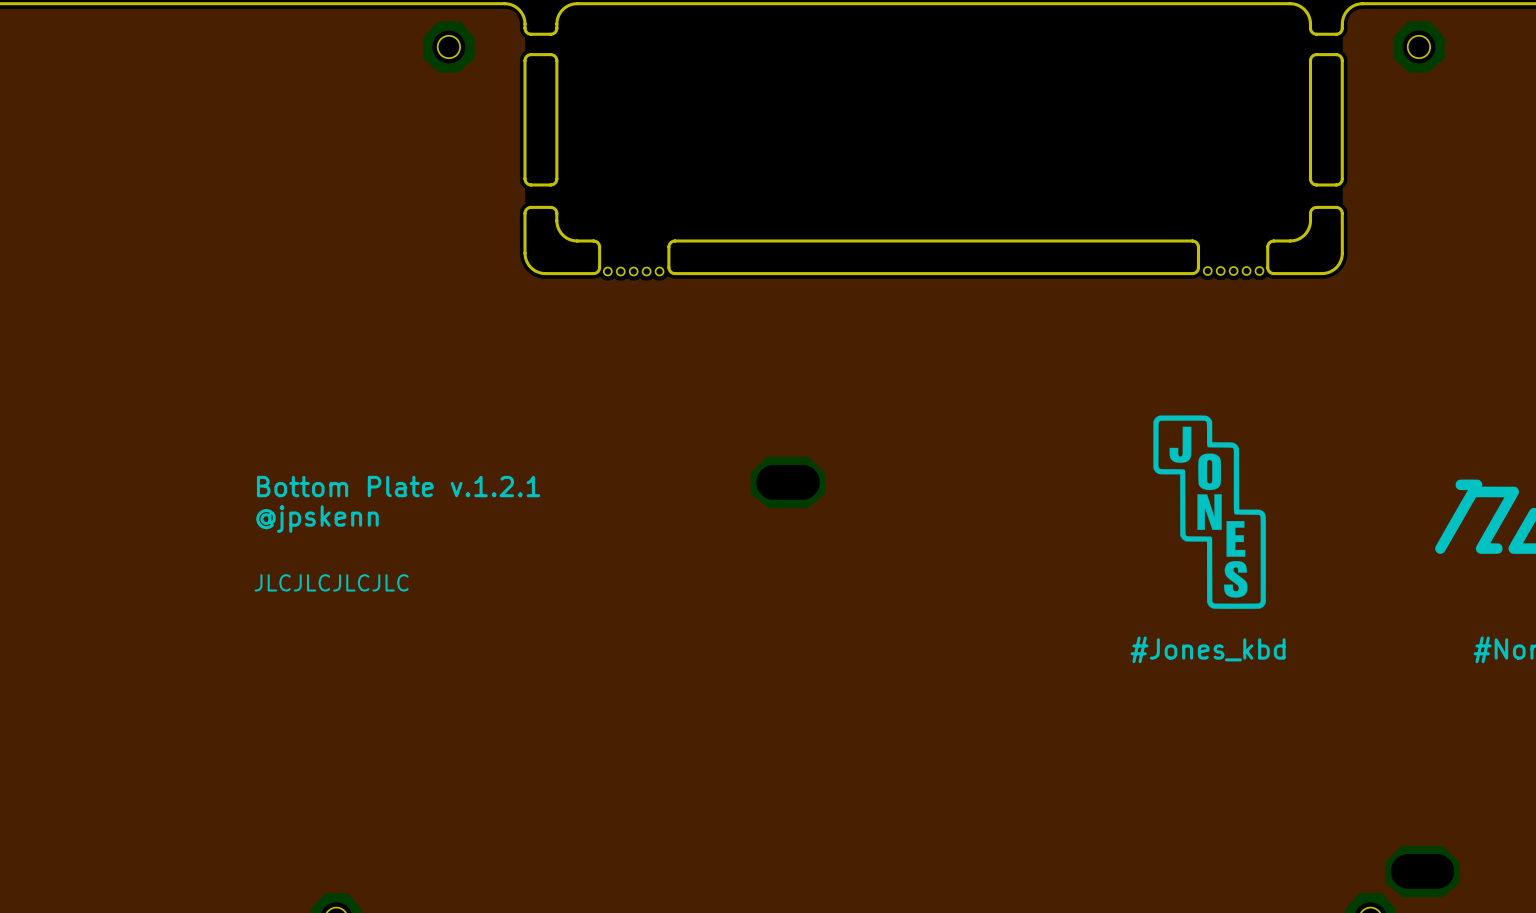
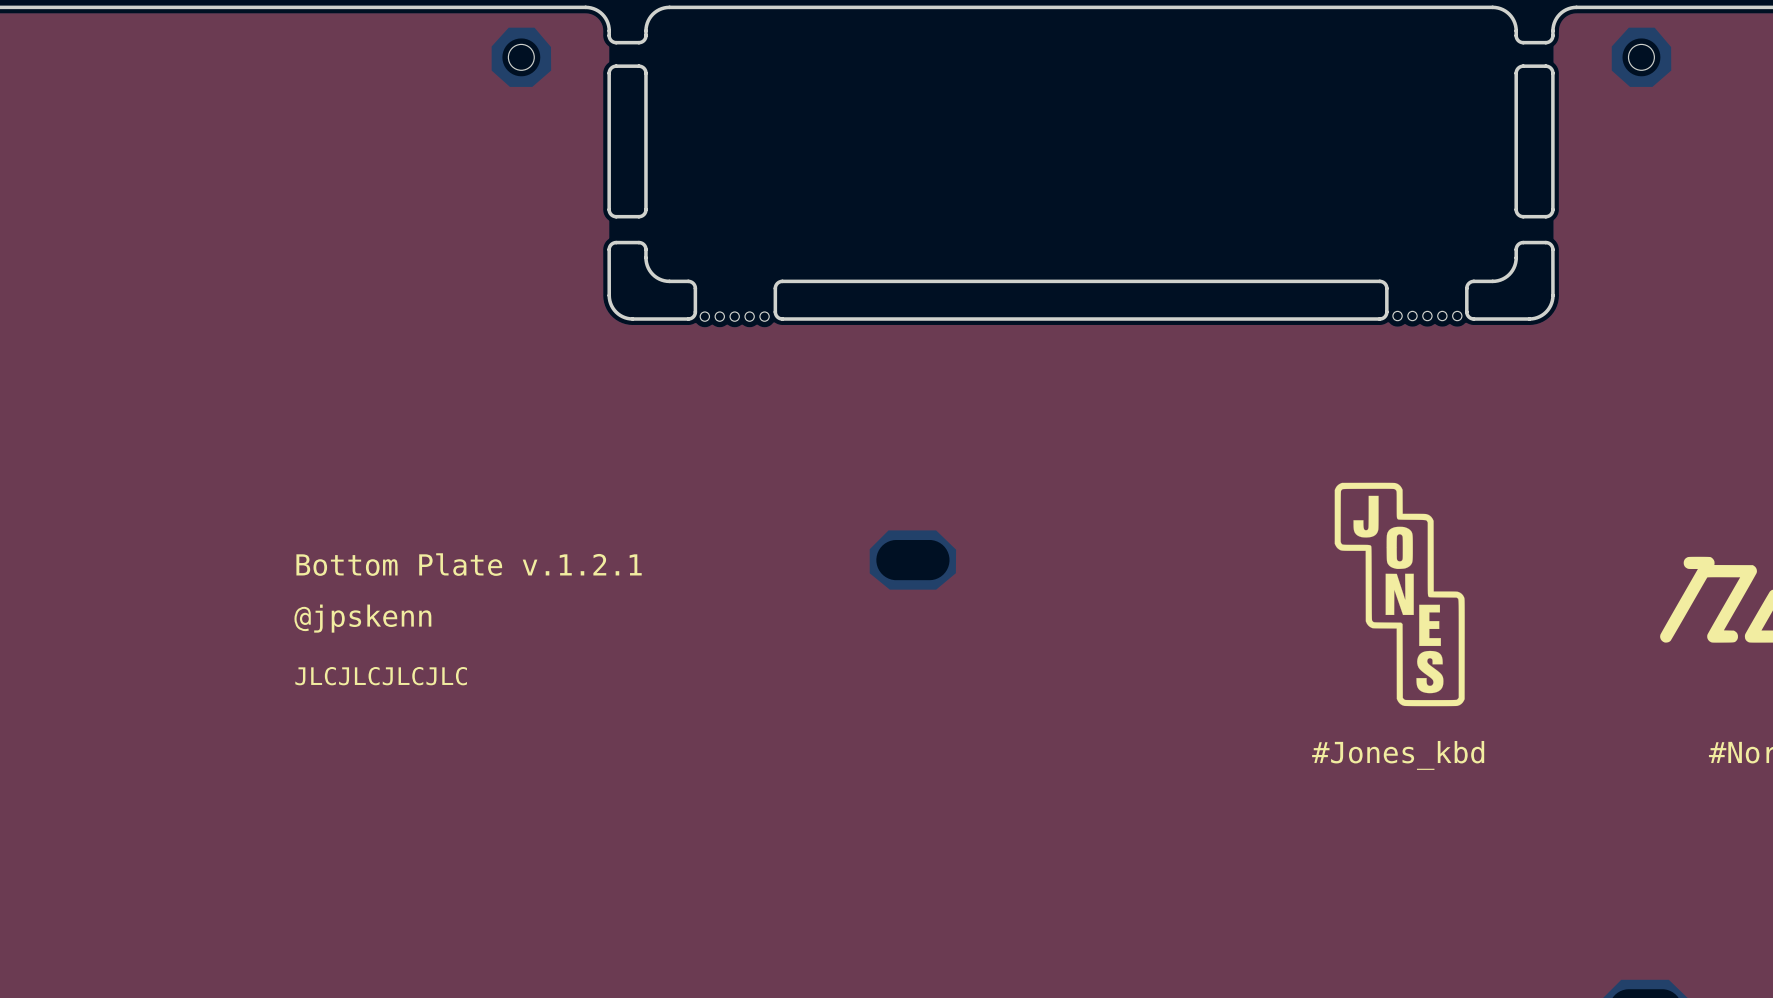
text position: @jpskenn (317, 519) -> @jpskenn (362, 618)

